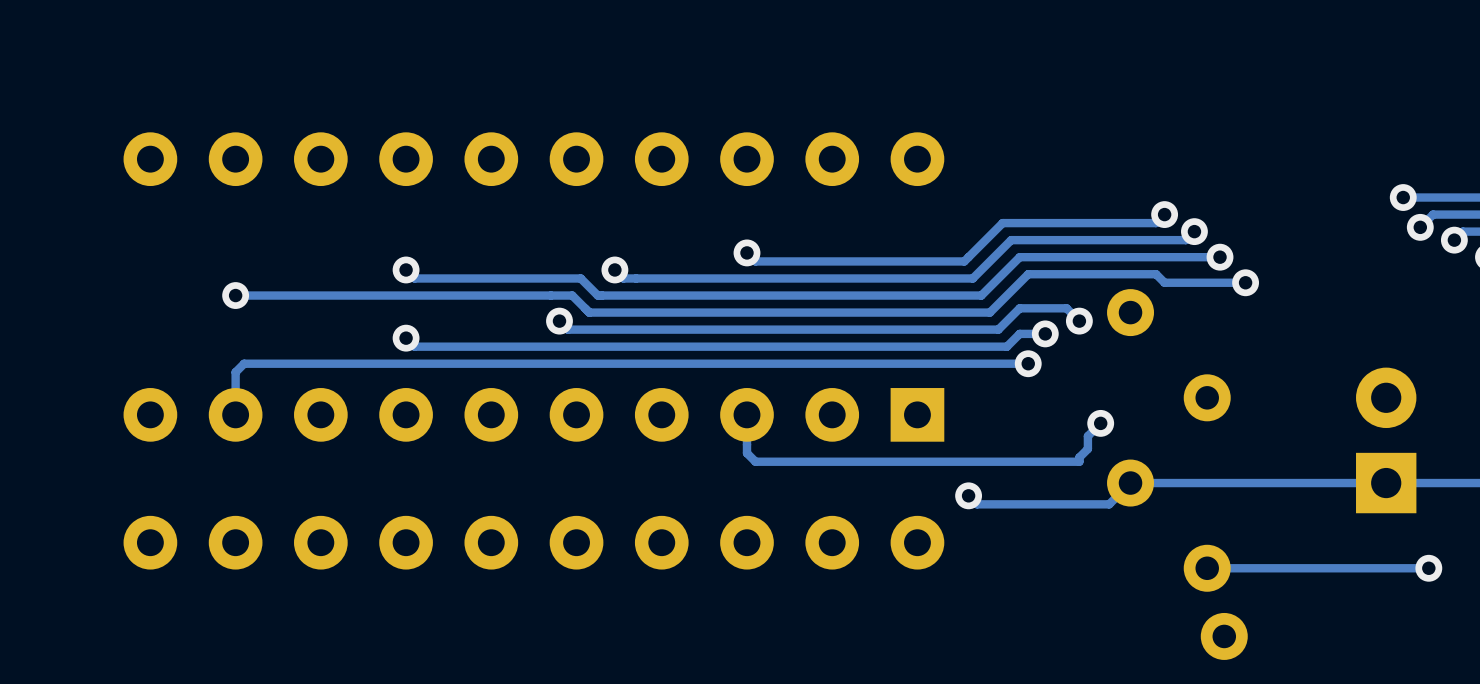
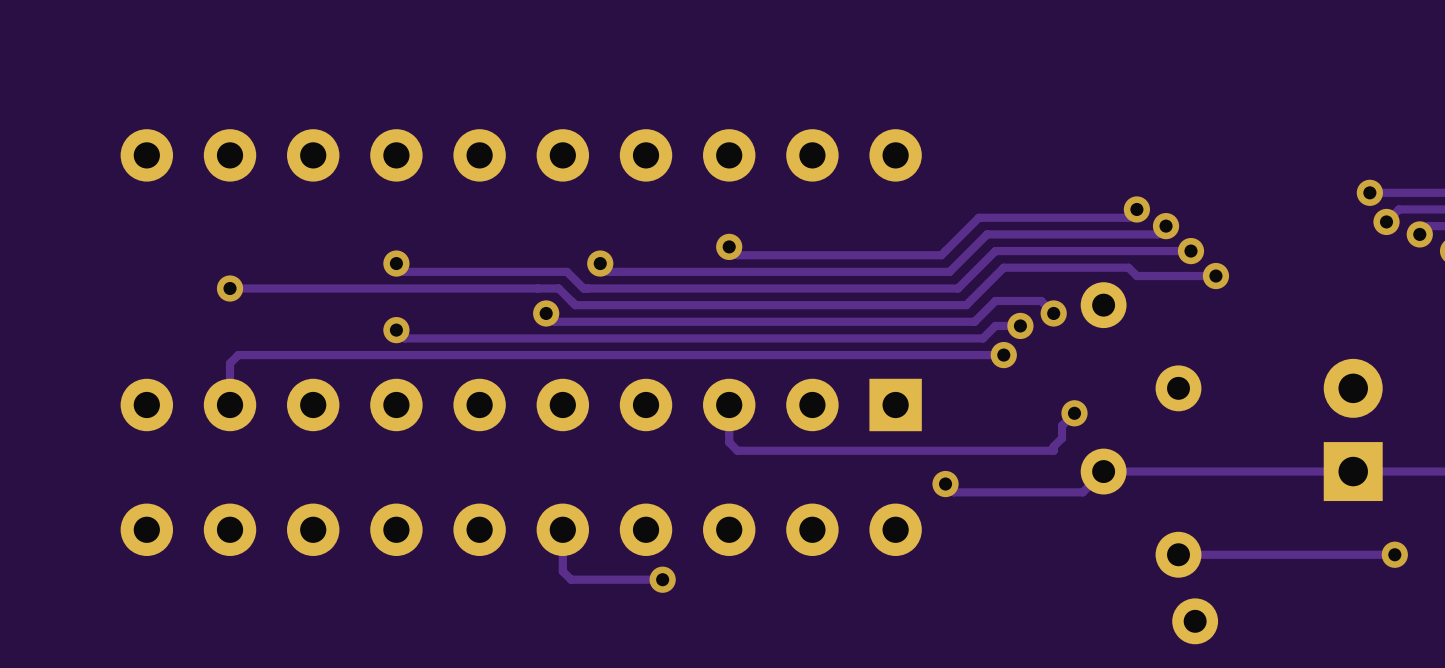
track: none -> (562, 529) (562, 571) (571, 579) (662, 579)
via: none -> (662, 579)

